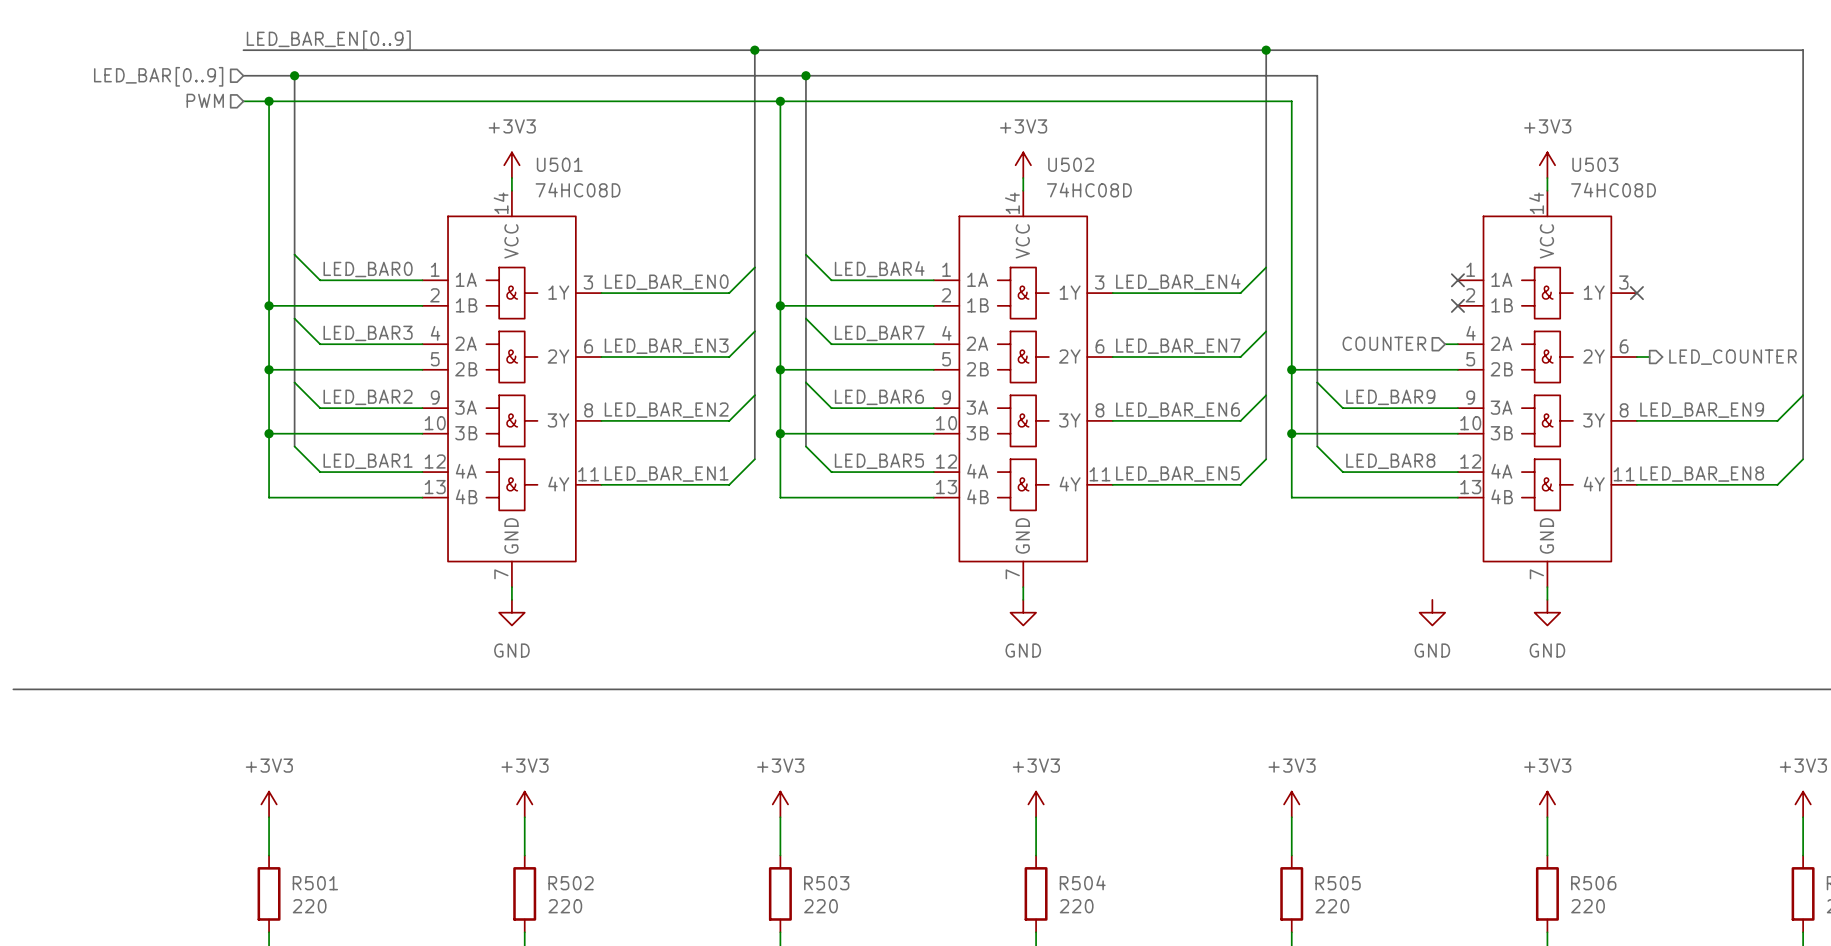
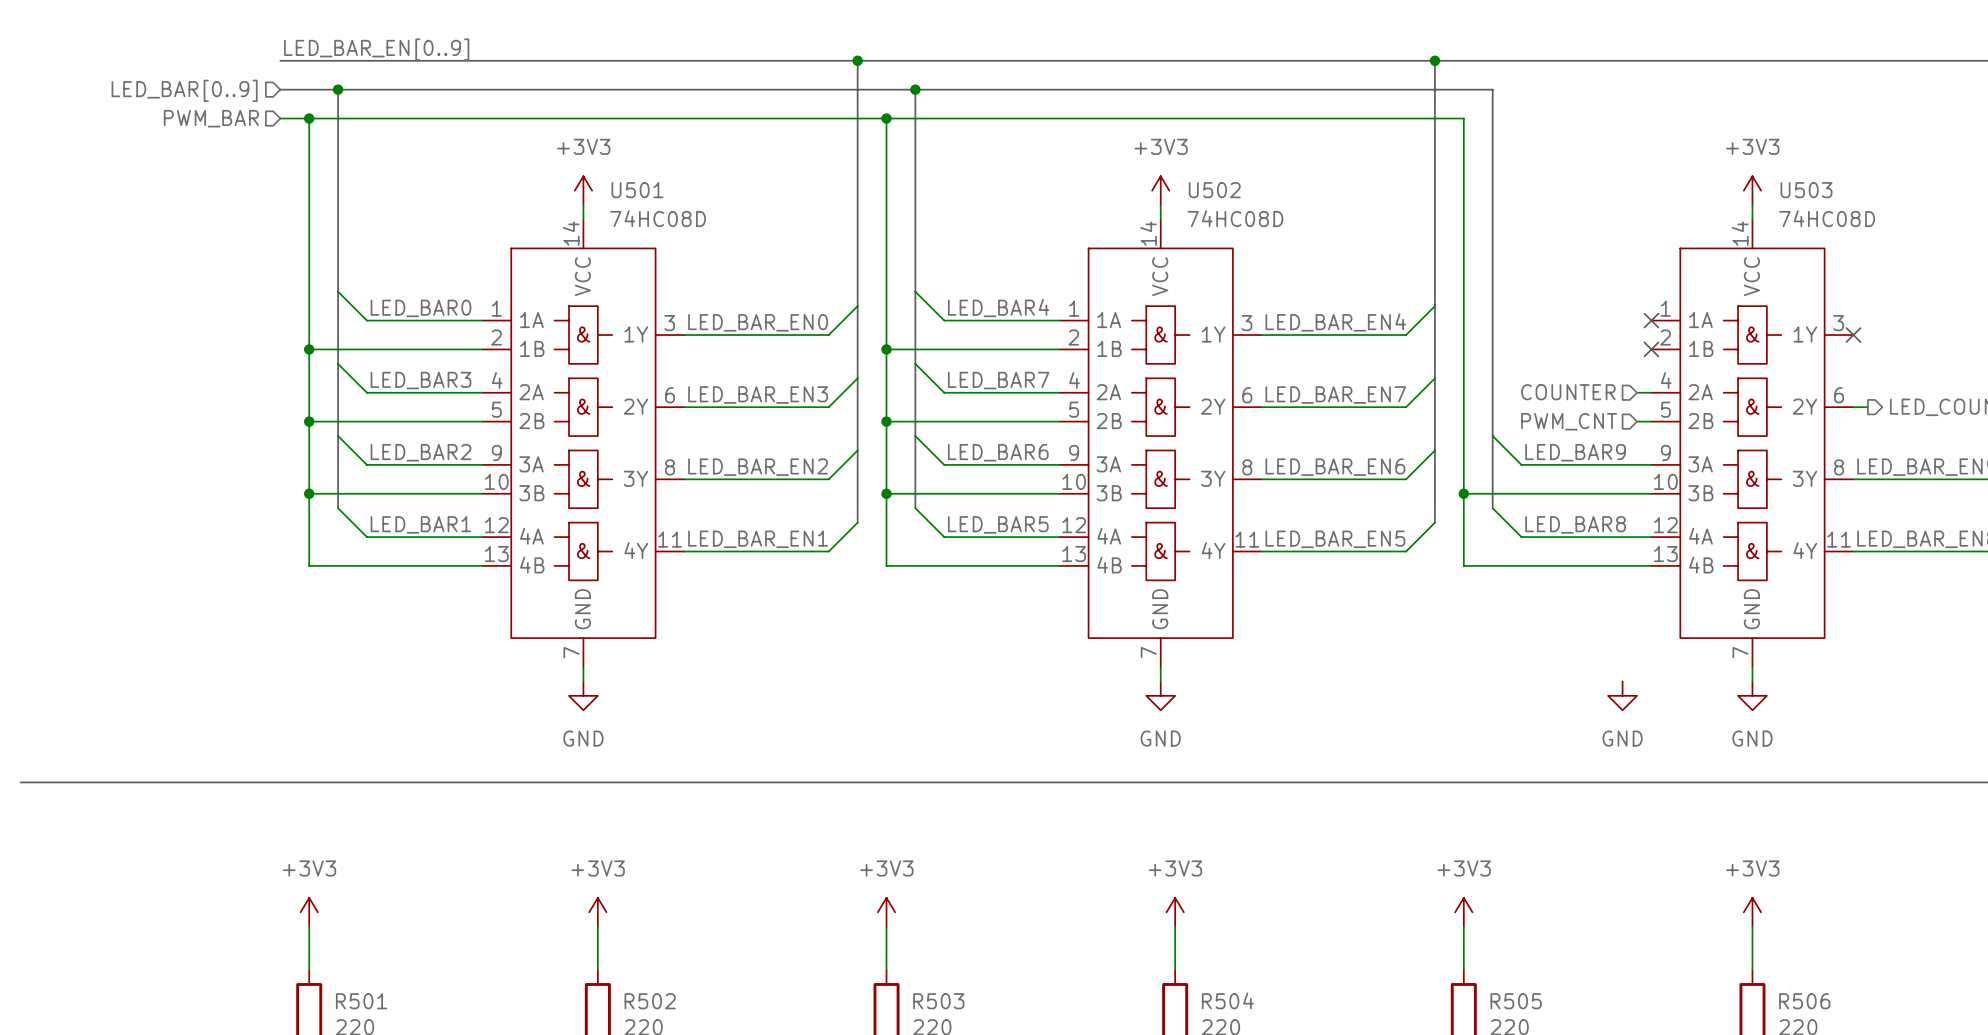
hierarchical label: PWM (205, 100) -> PWM_BAR (211, 118)
wire: (1291, 369) (1445, 369) -> none
junction: (1291, 369) -> none
hierarchical label: none -> PWM_CNT (1569, 421)

